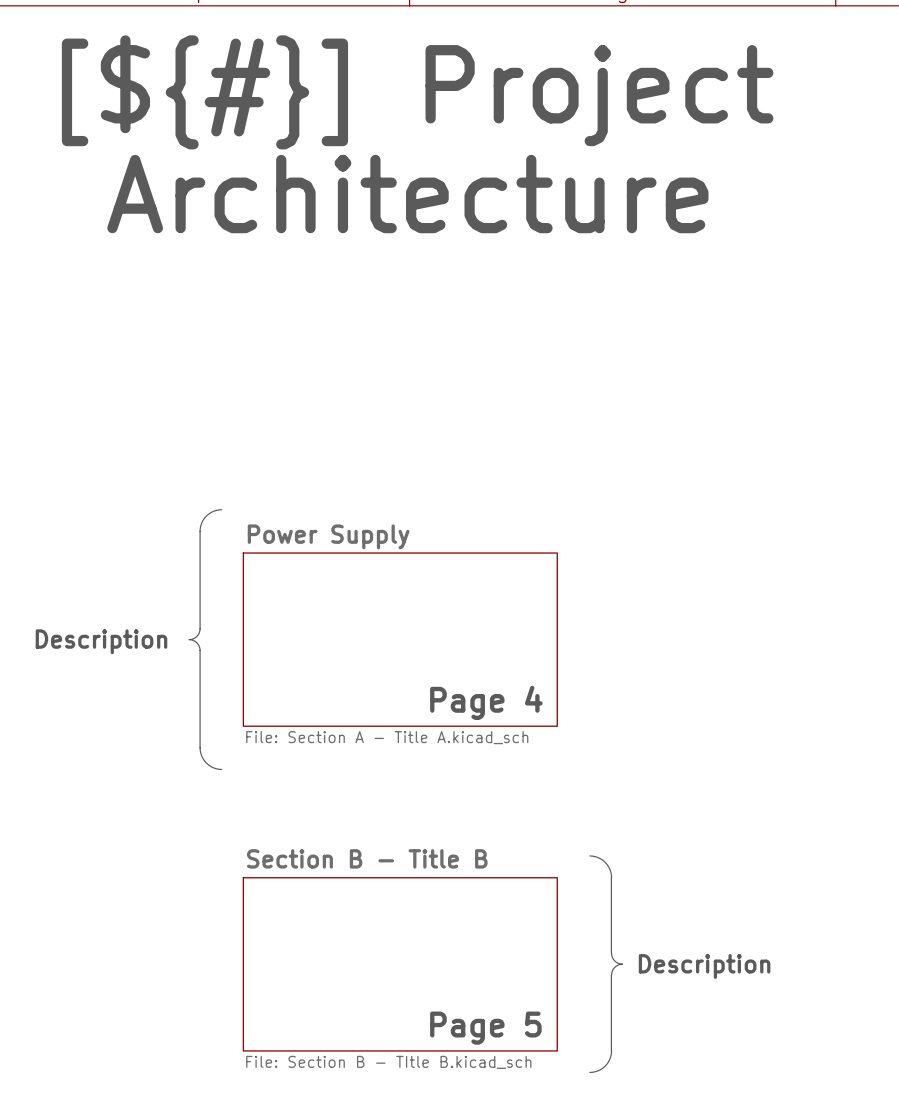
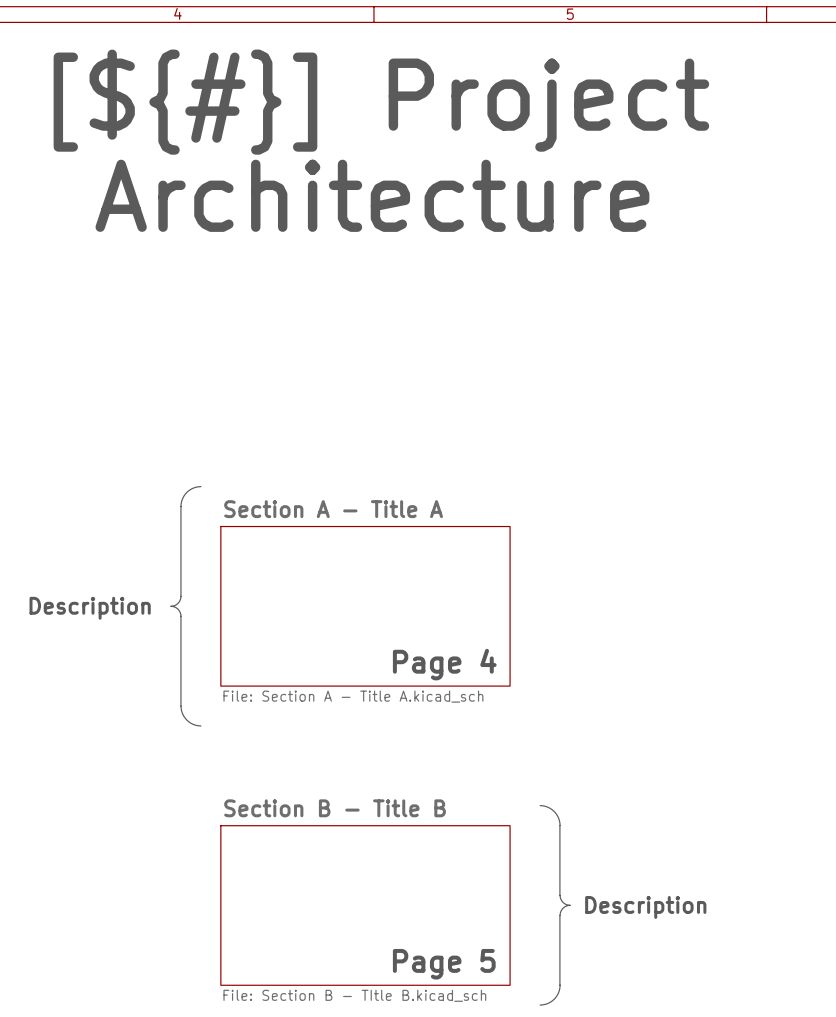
sheet Power Supply name: Power Supply (328, 536) -> Section A - Title A (333, 509)

